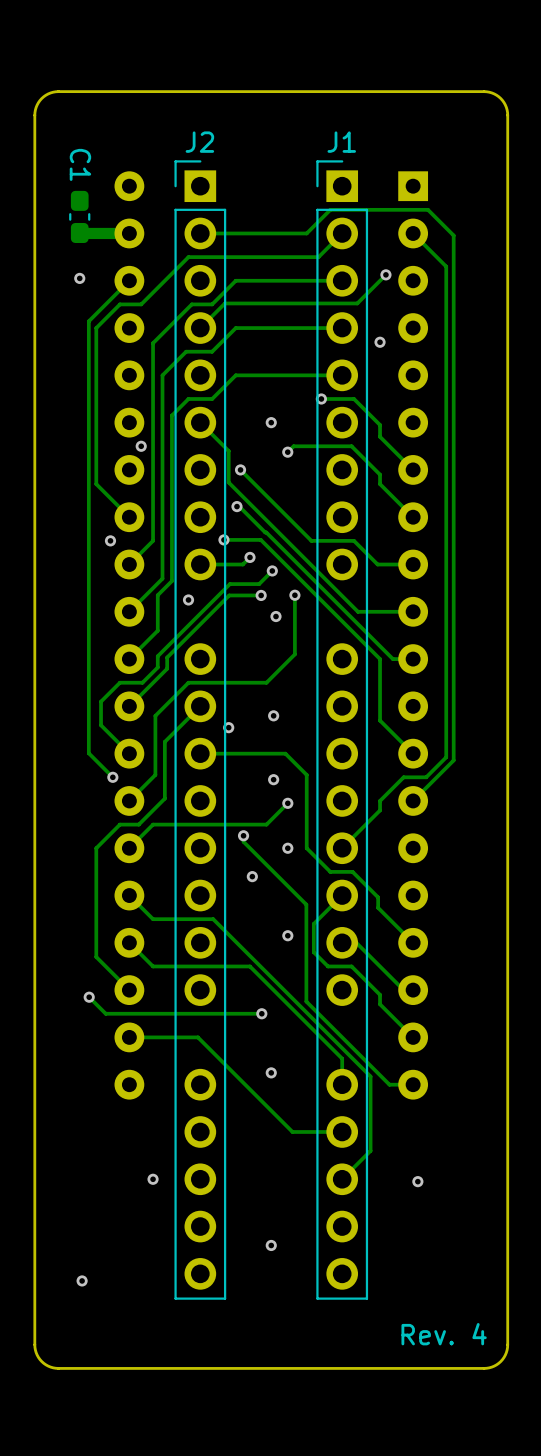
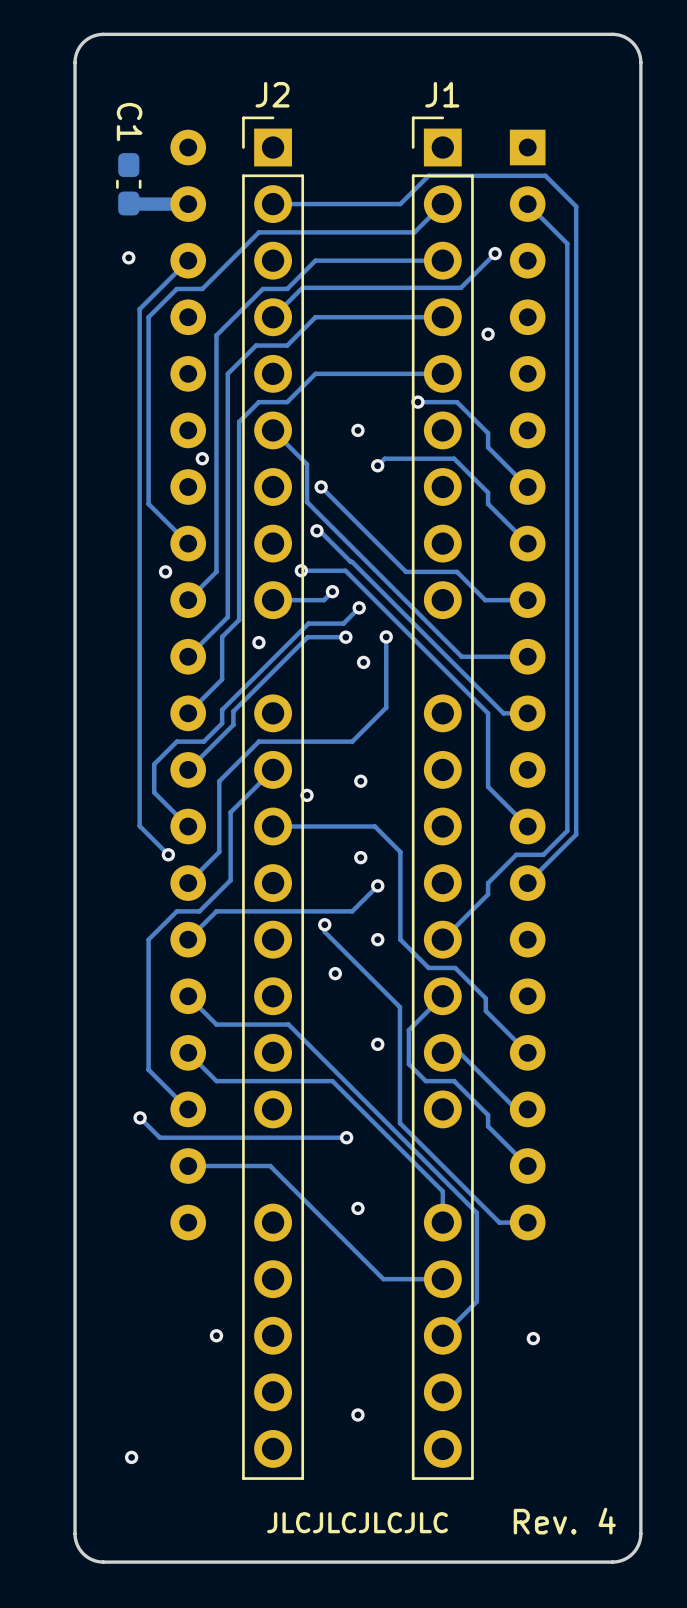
text: none -> JLCJLCJLCJLC (357, 1522)

